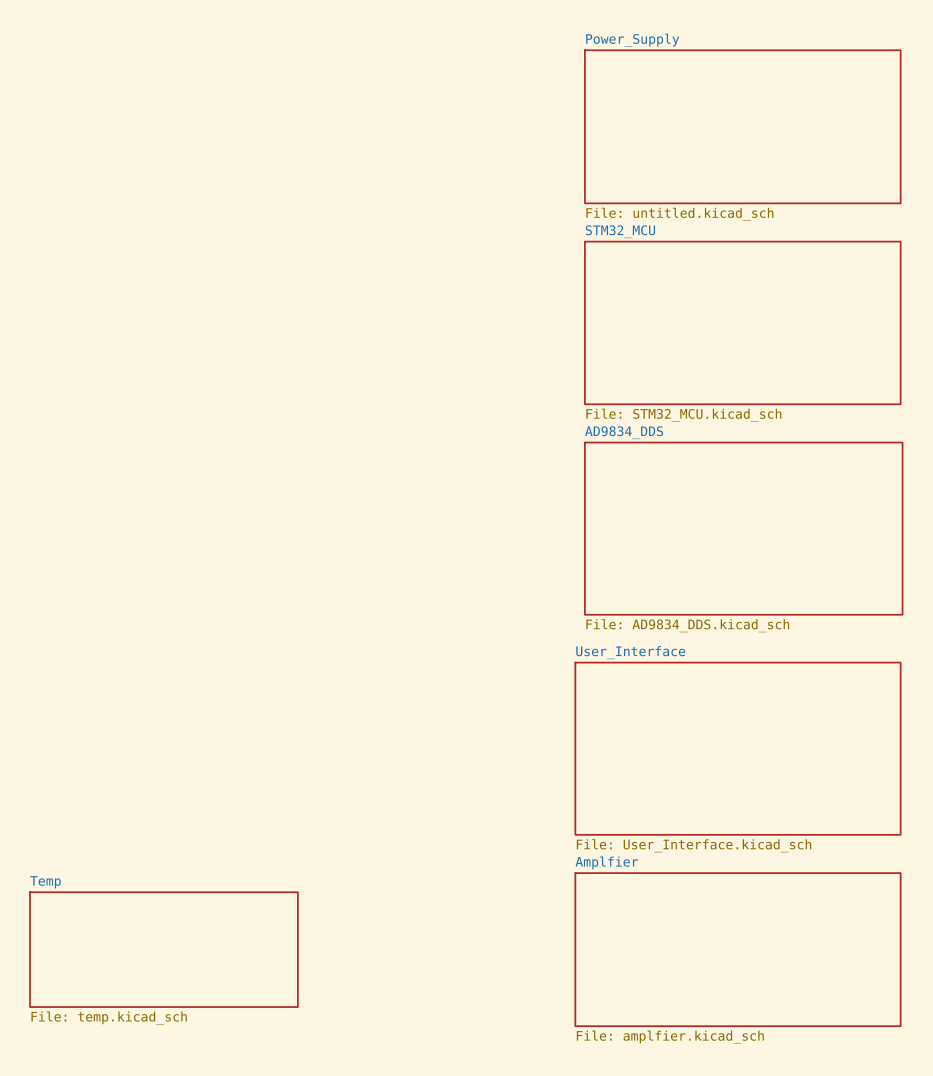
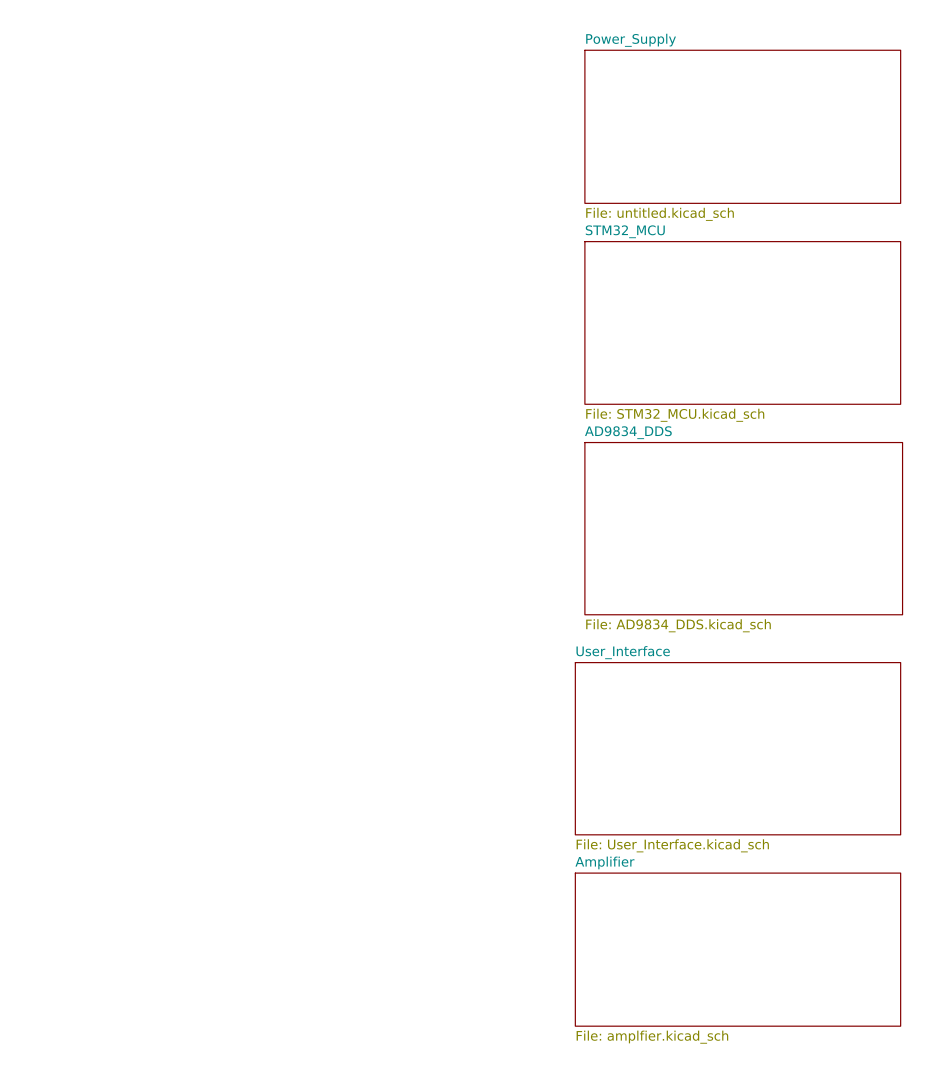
sheet Amplfier name: Amplfier (606, 862) -> Amplifier (604, 862)
sheet Temp: File: temp.kicad_sch (163, 949) -> none

